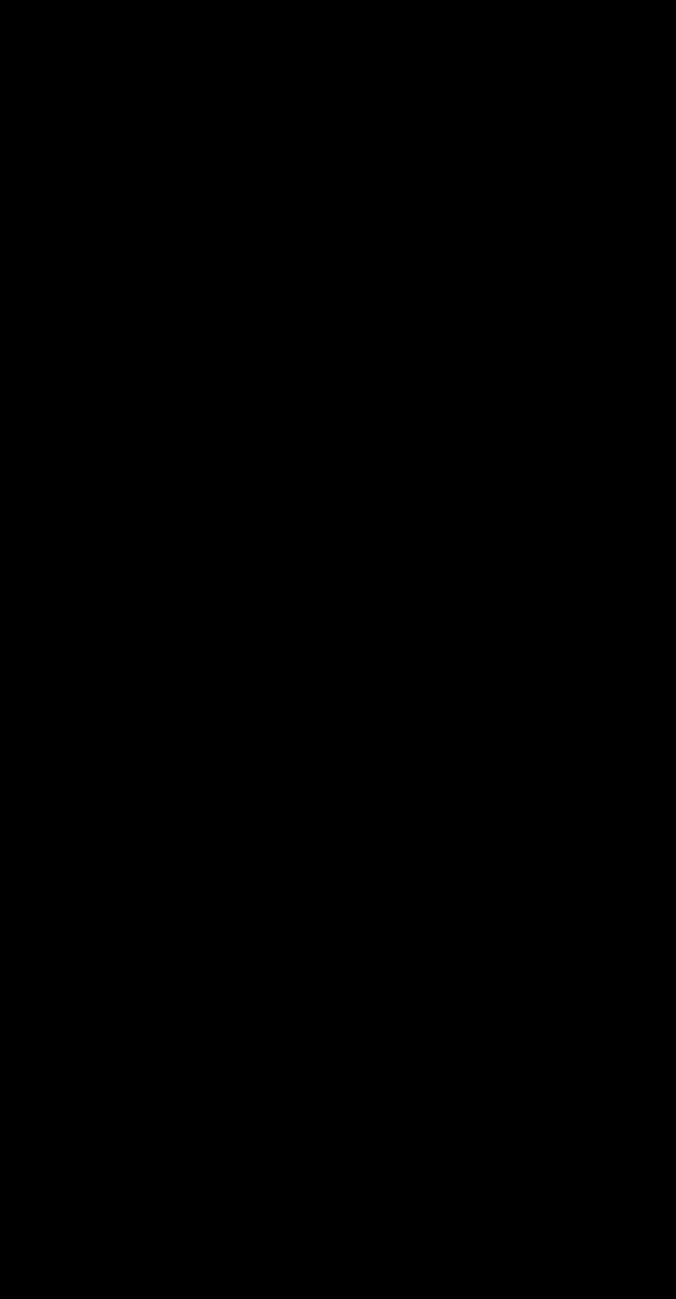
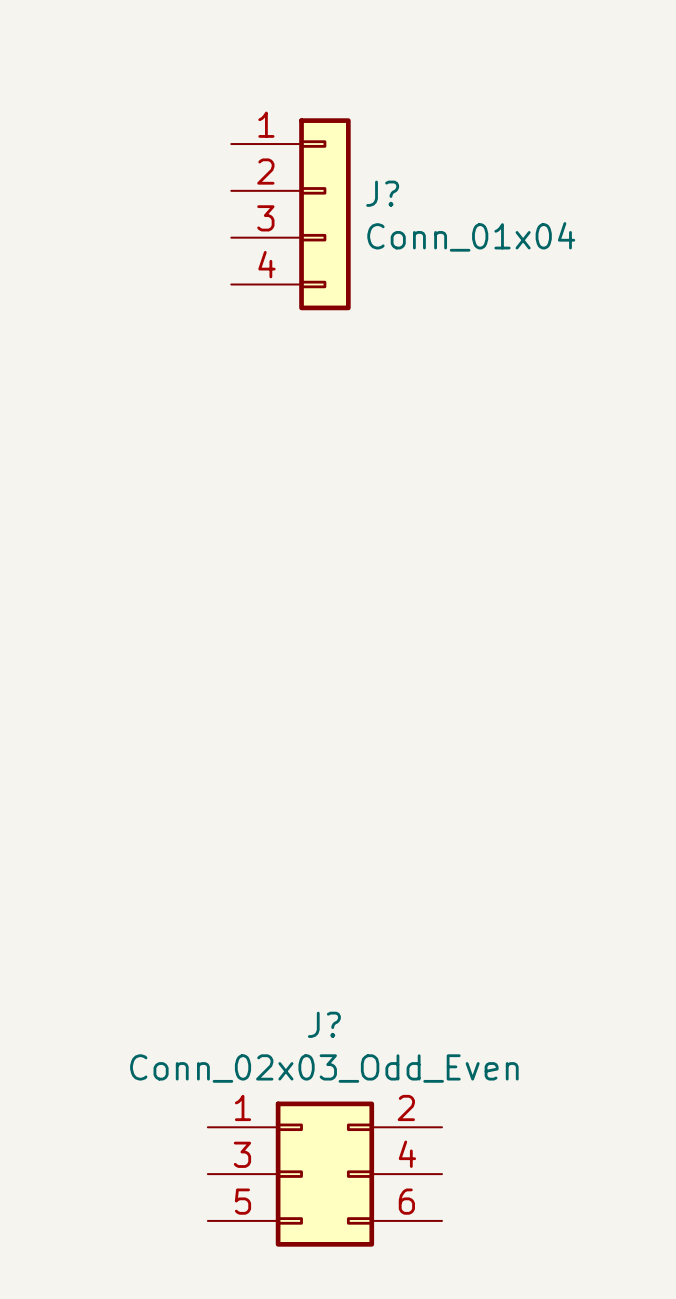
J?: none -> Conn_01x04 (290, 214)
J?: none -> Conn_02x03_Odd_Even (324, 1174)

